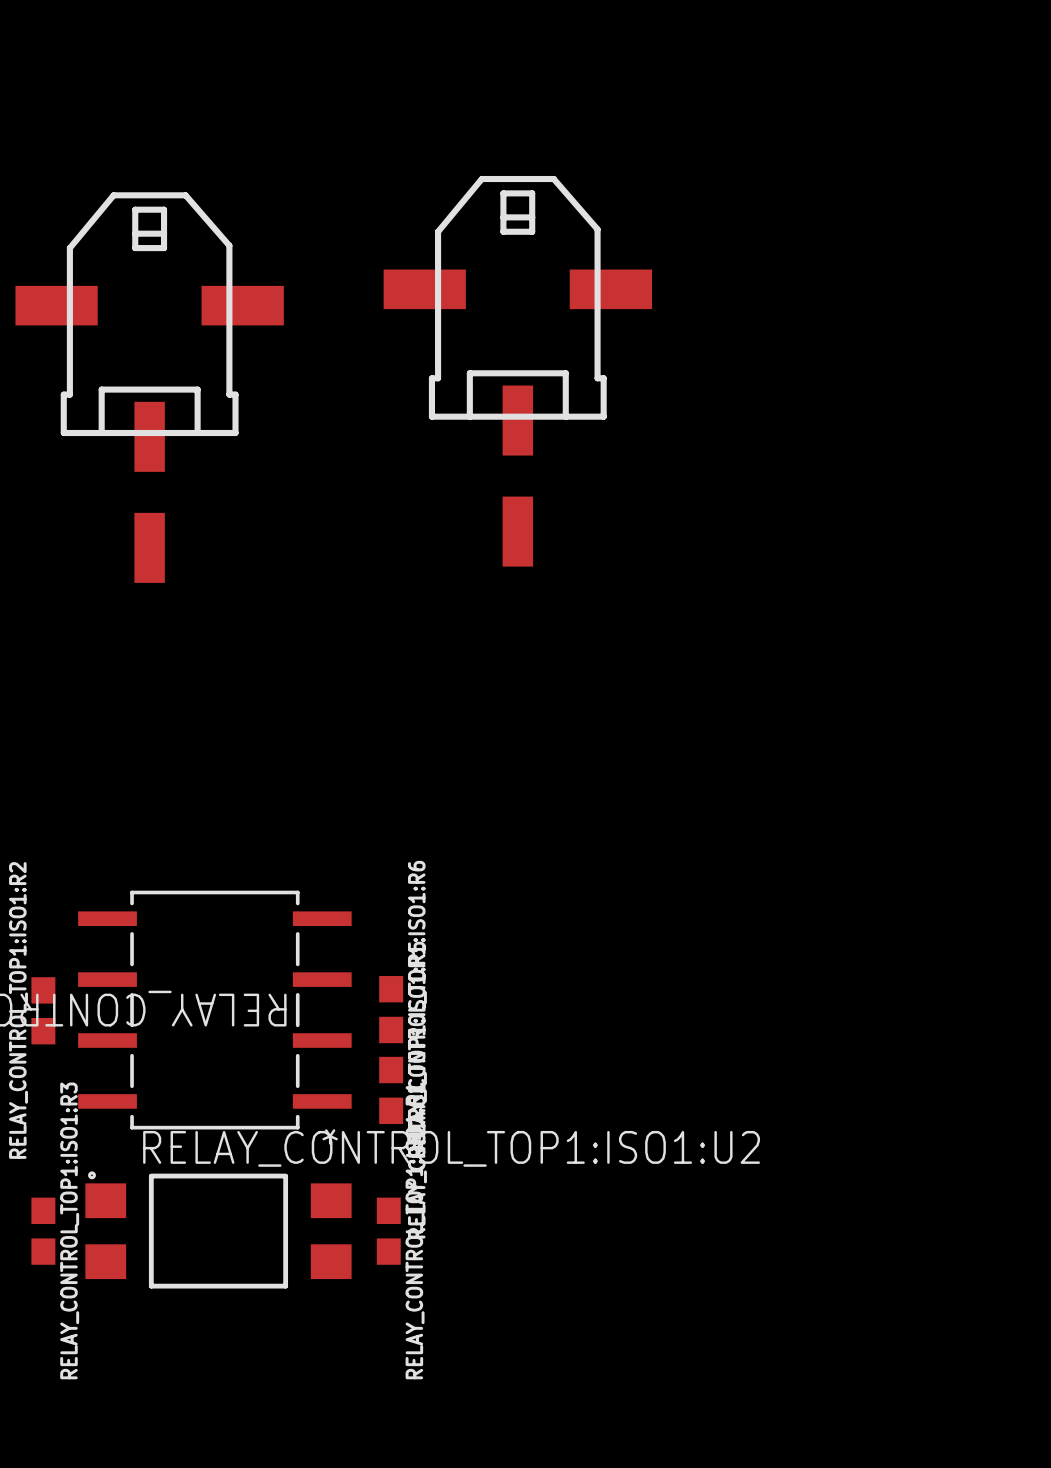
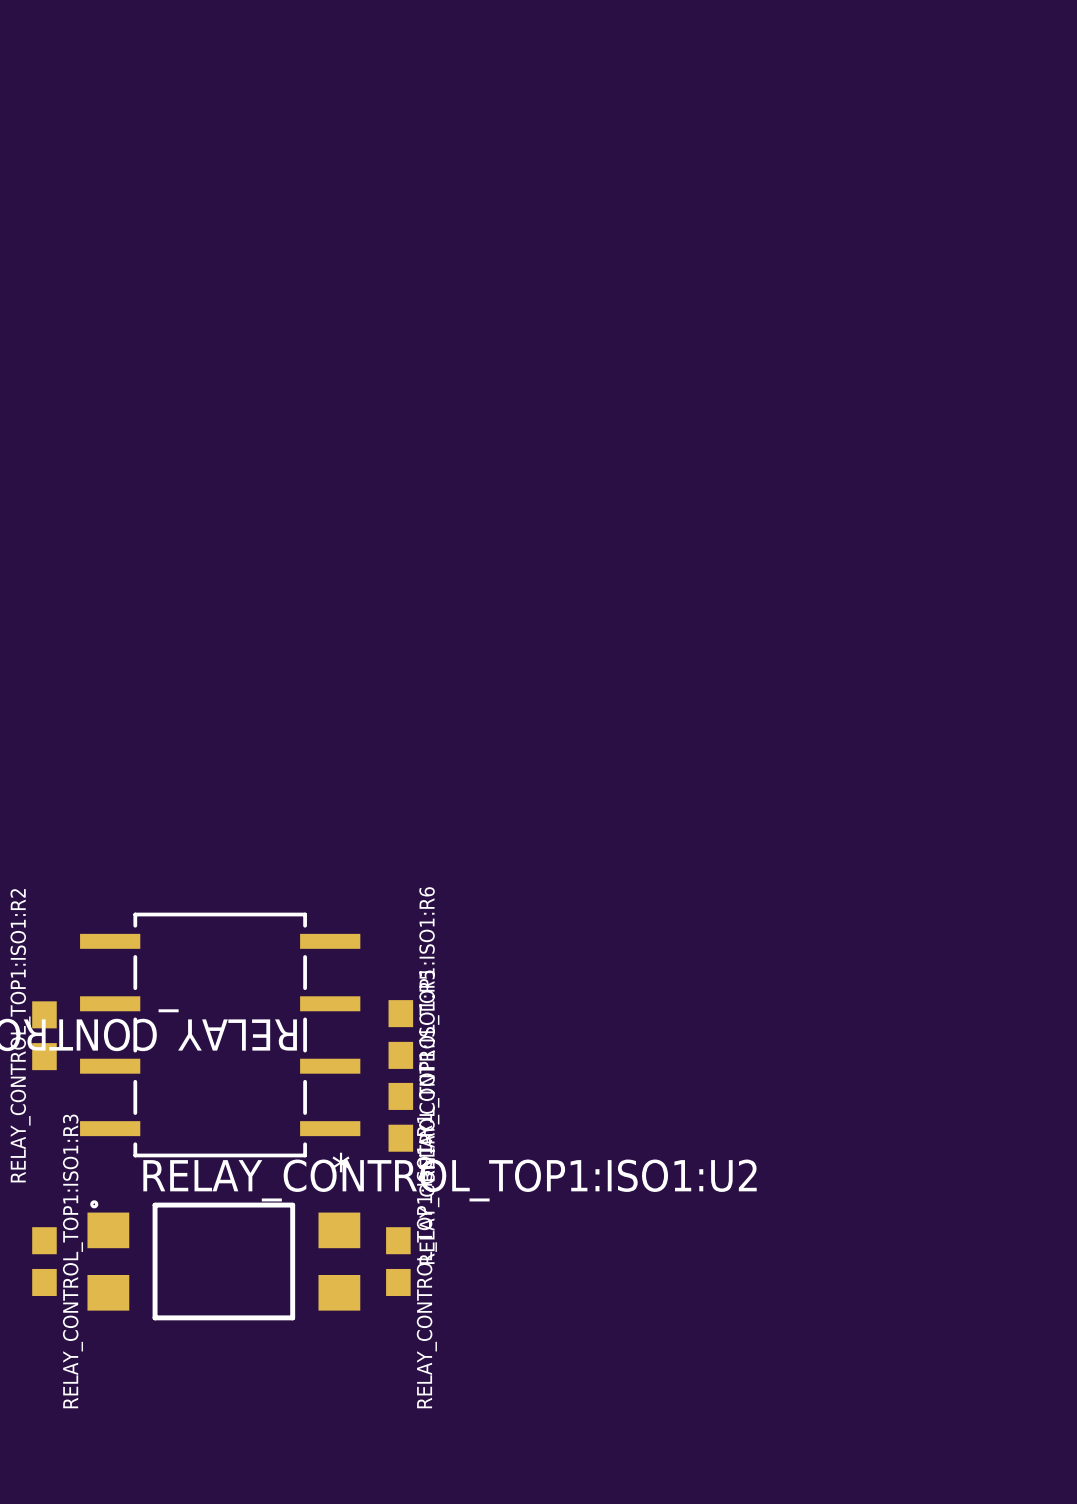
part: (517, 371) -> none
part: (149, 387) -> none

